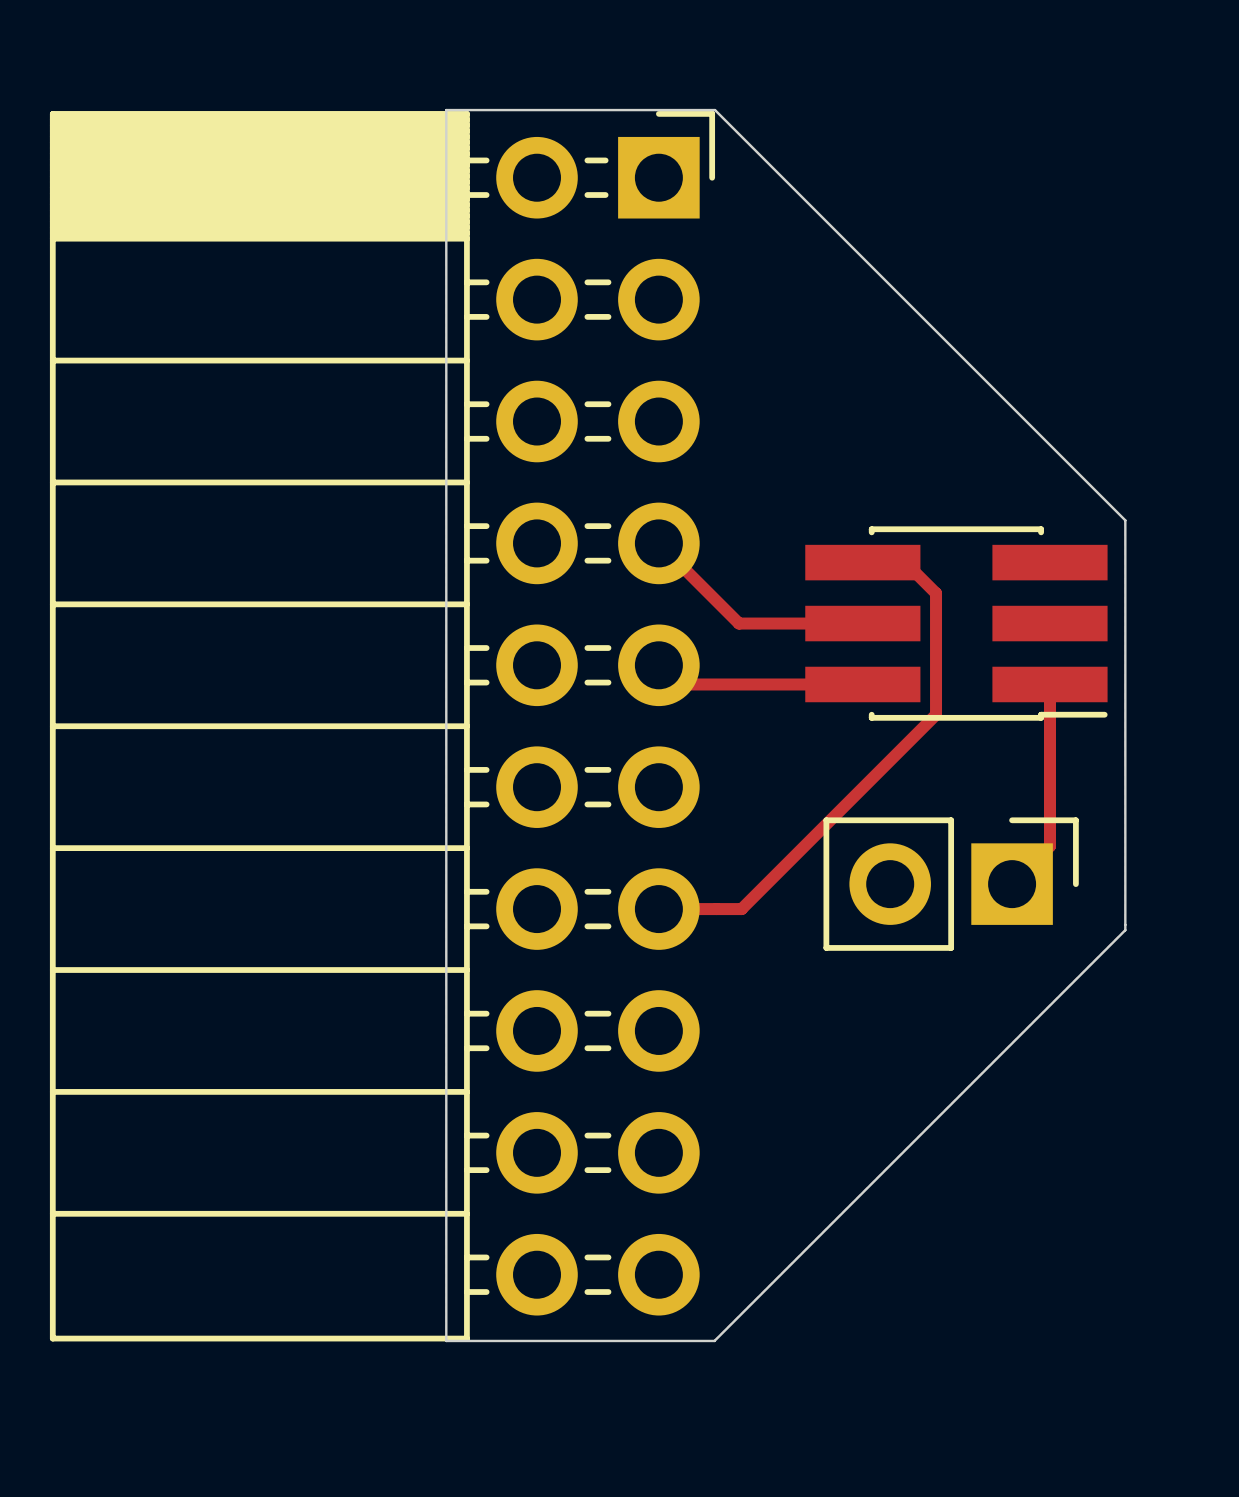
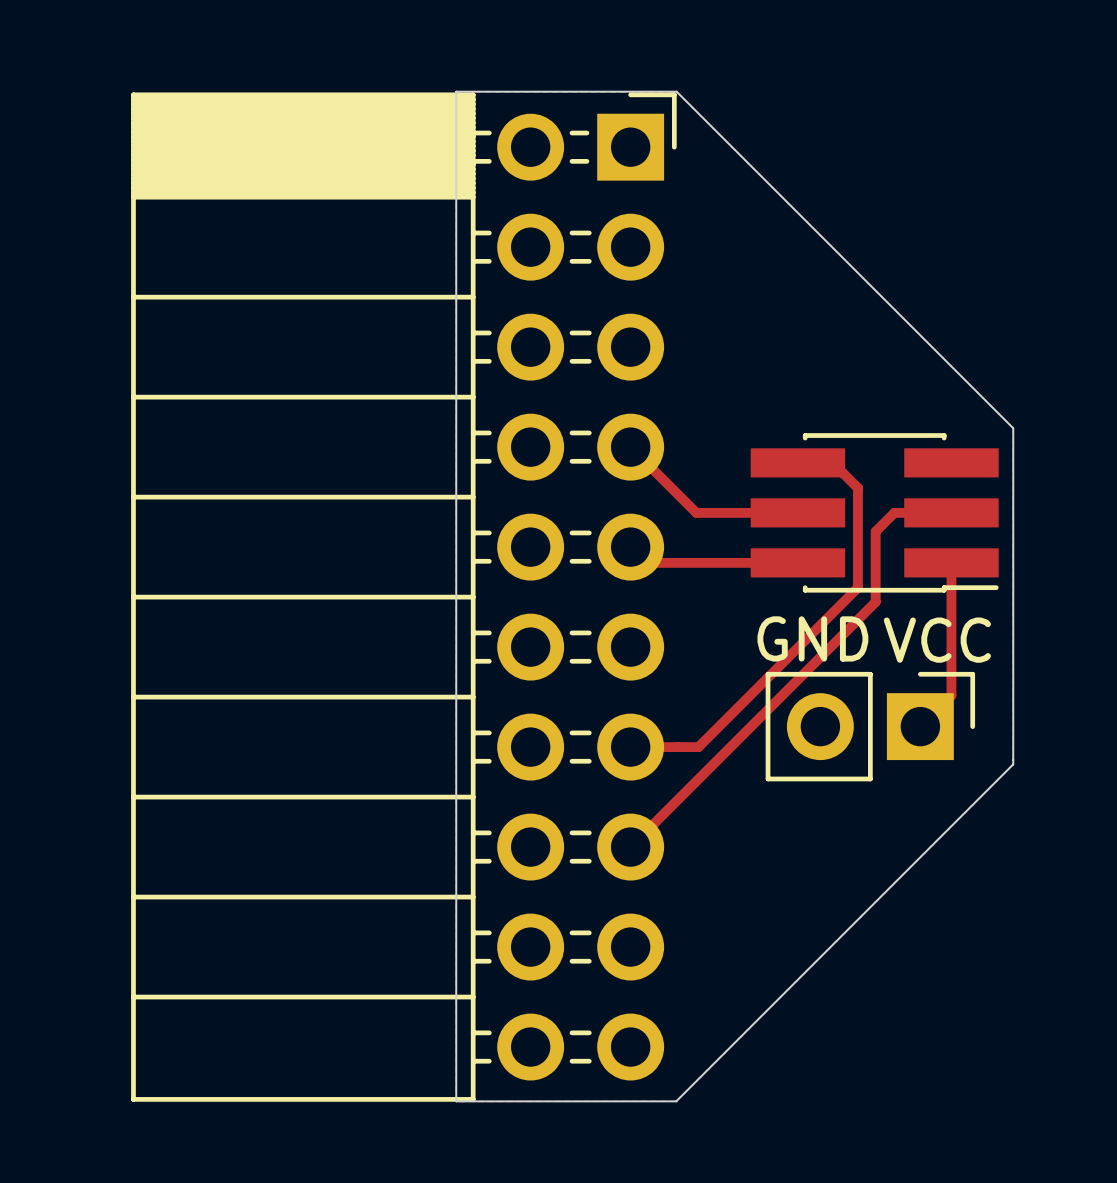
top track: none -> (951, 512) (894, 512) (875, 531) (875, 602) (630, 847)
text: none -> GND (812, 638)
text: none -> VCC (937, 640)

